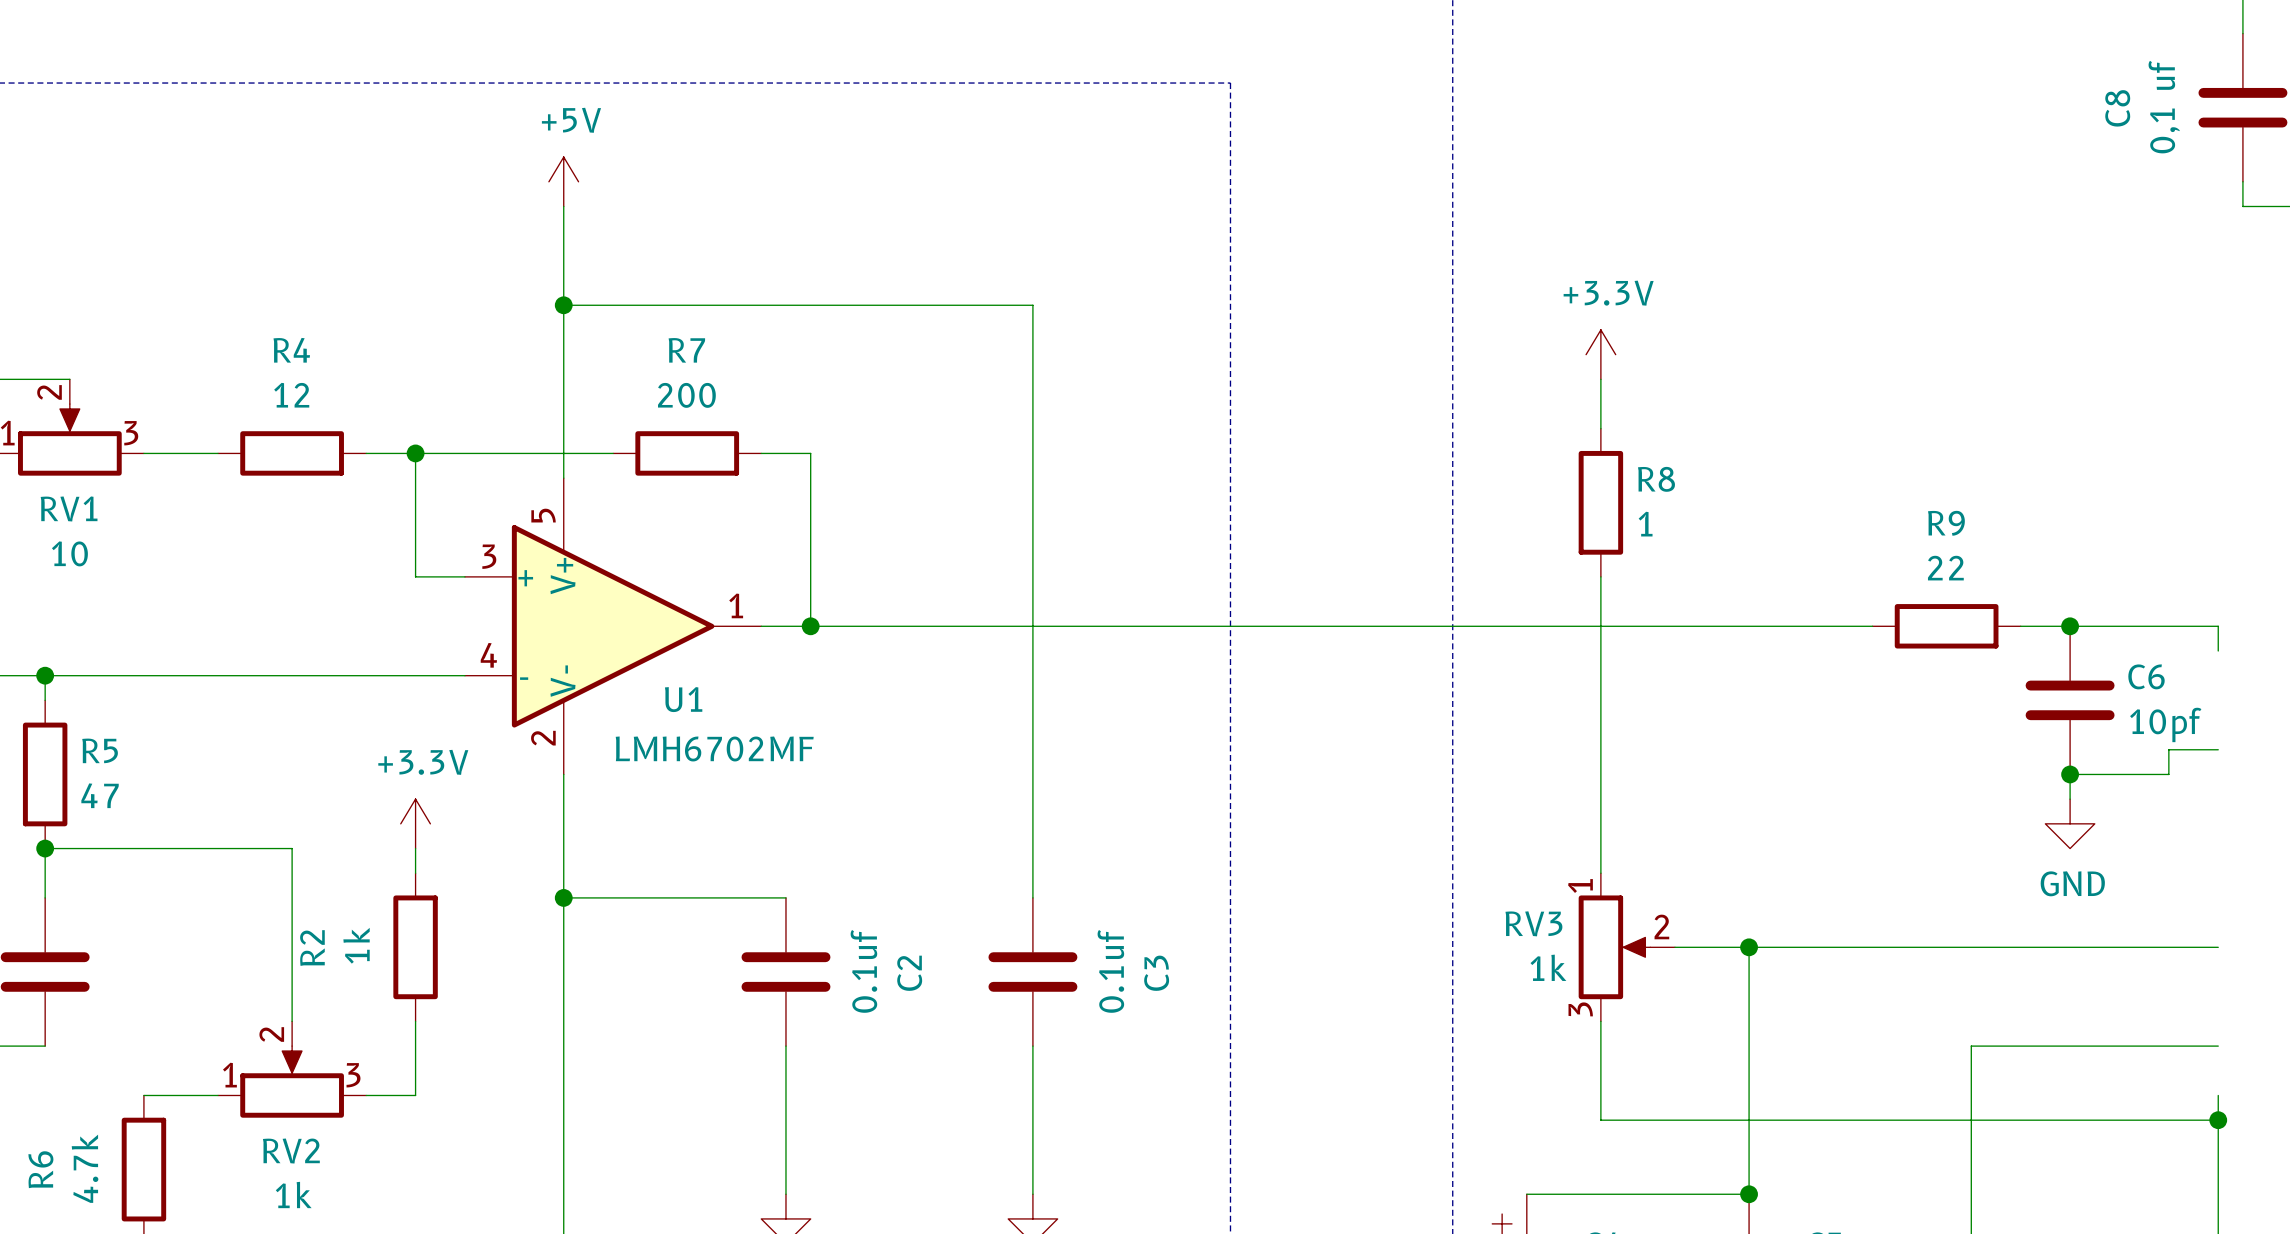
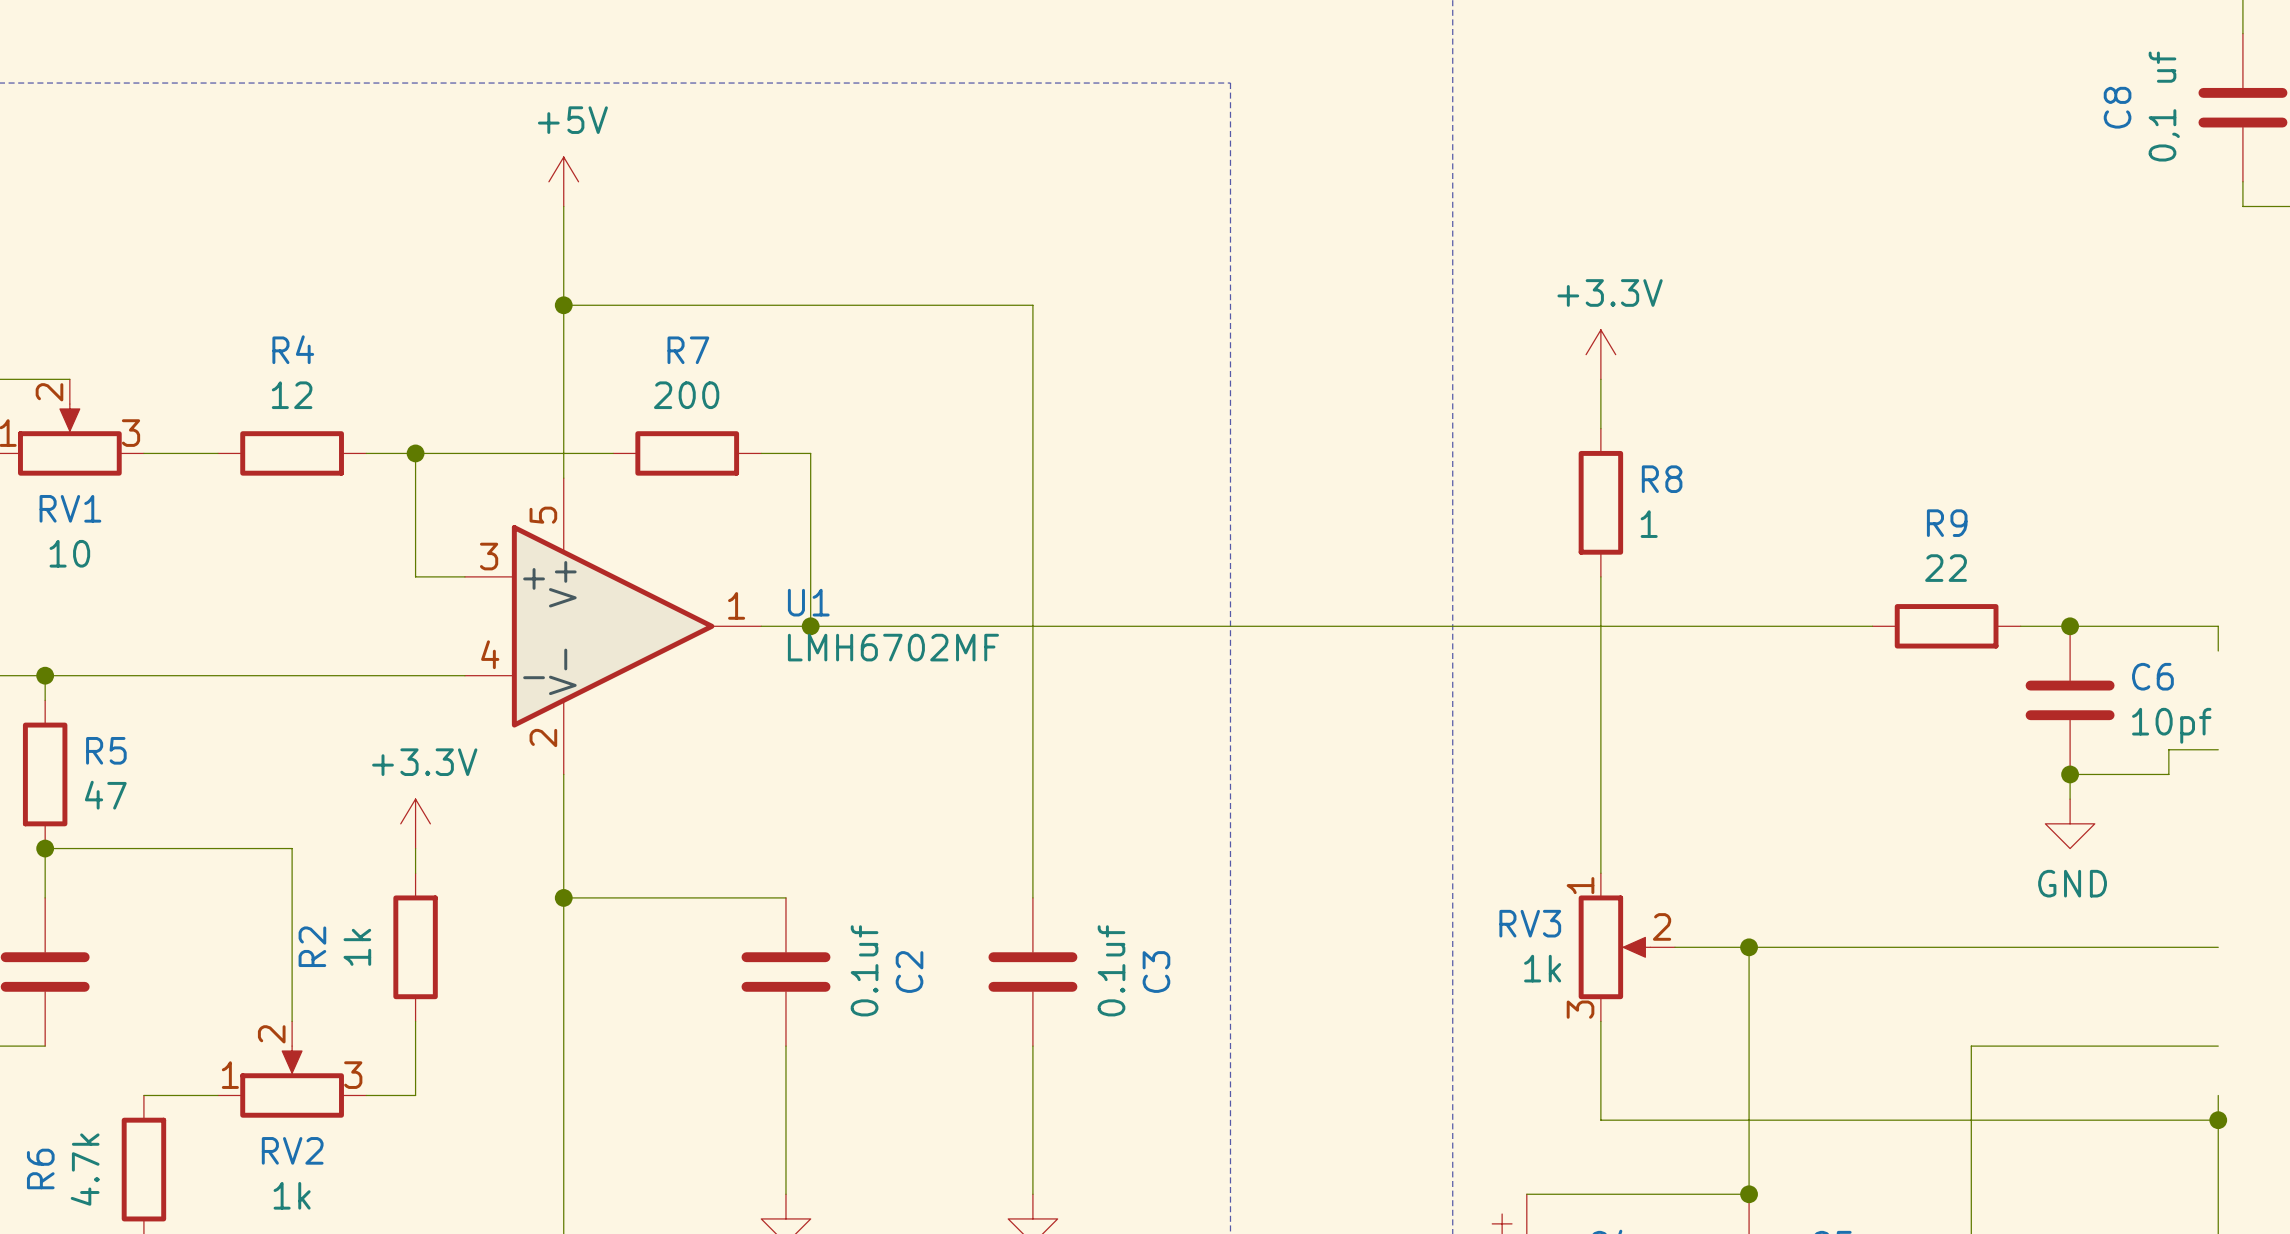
U1 name position: U1 (683, 699) -> U1 (808, 602)
U1 value position: LMH6702MF (714, 748) -> LMH6702MF (893, 647)

